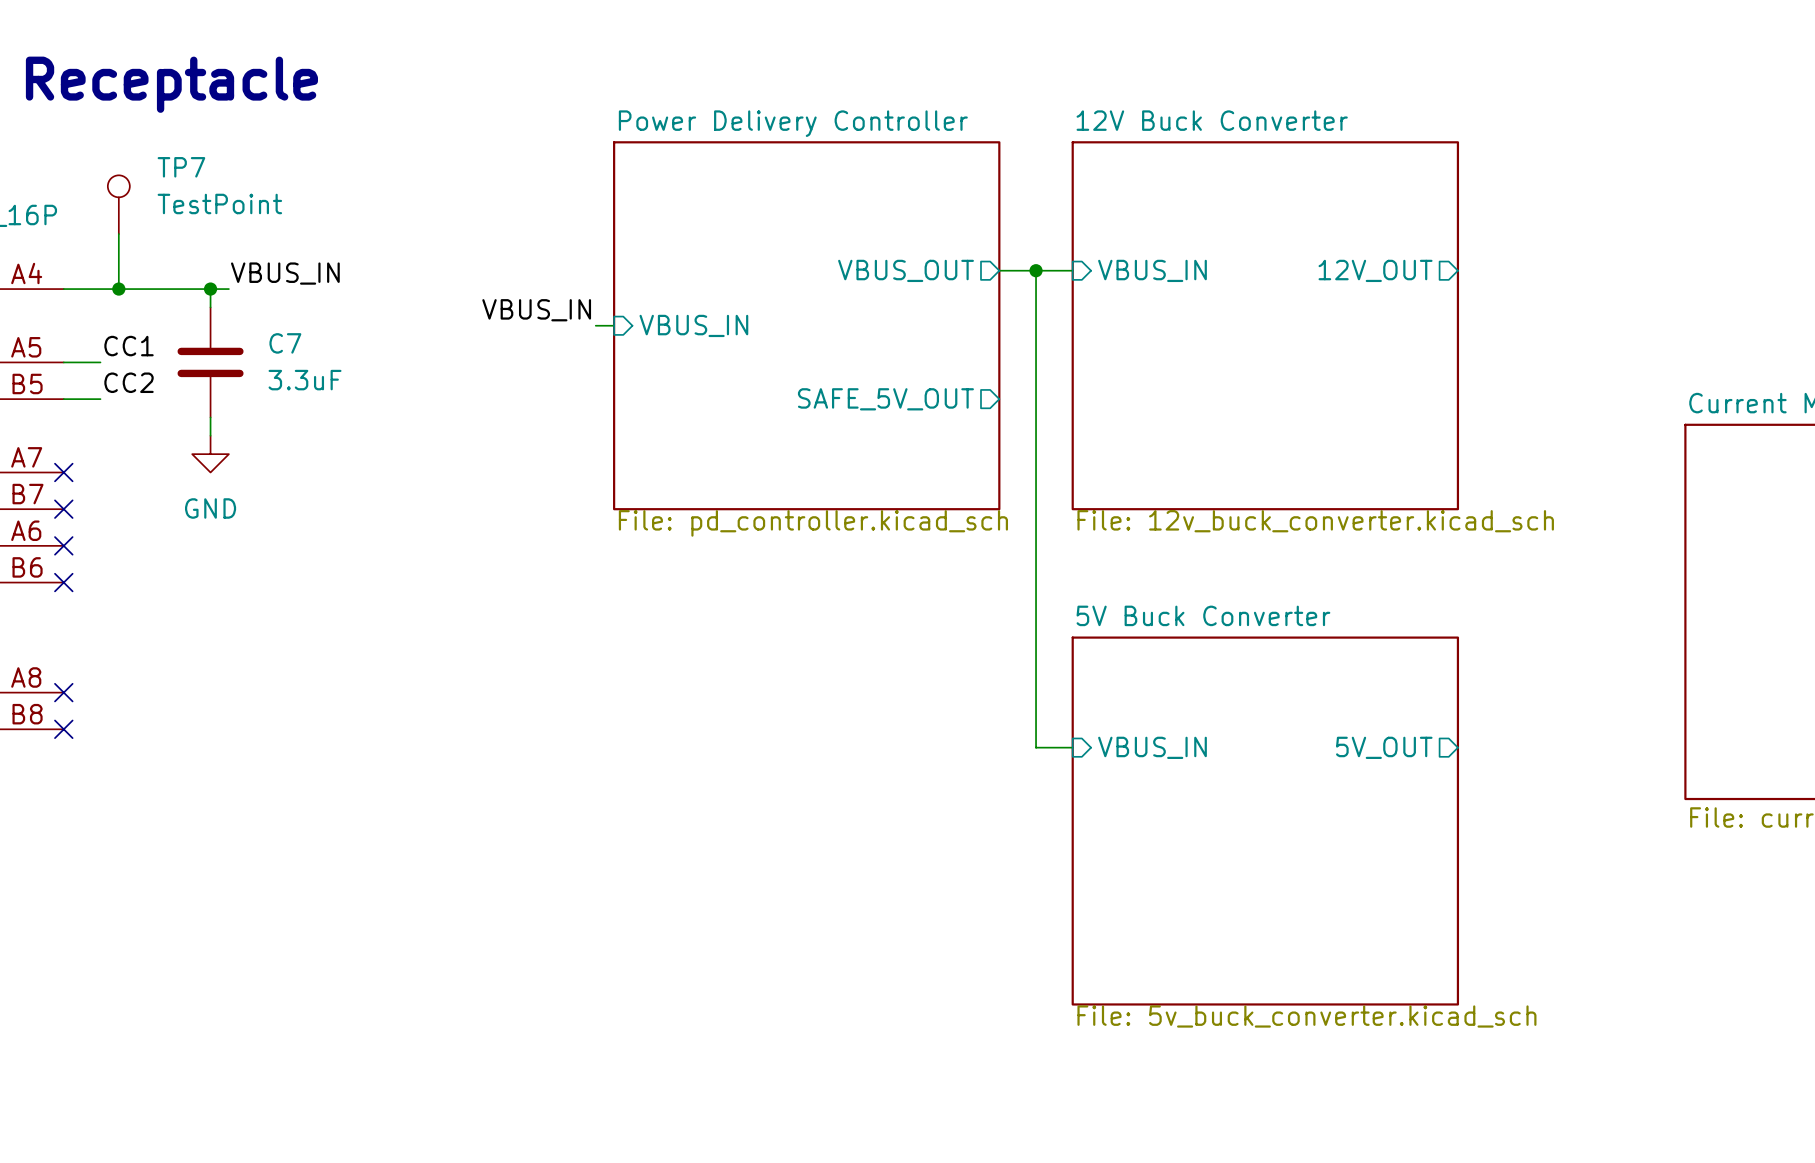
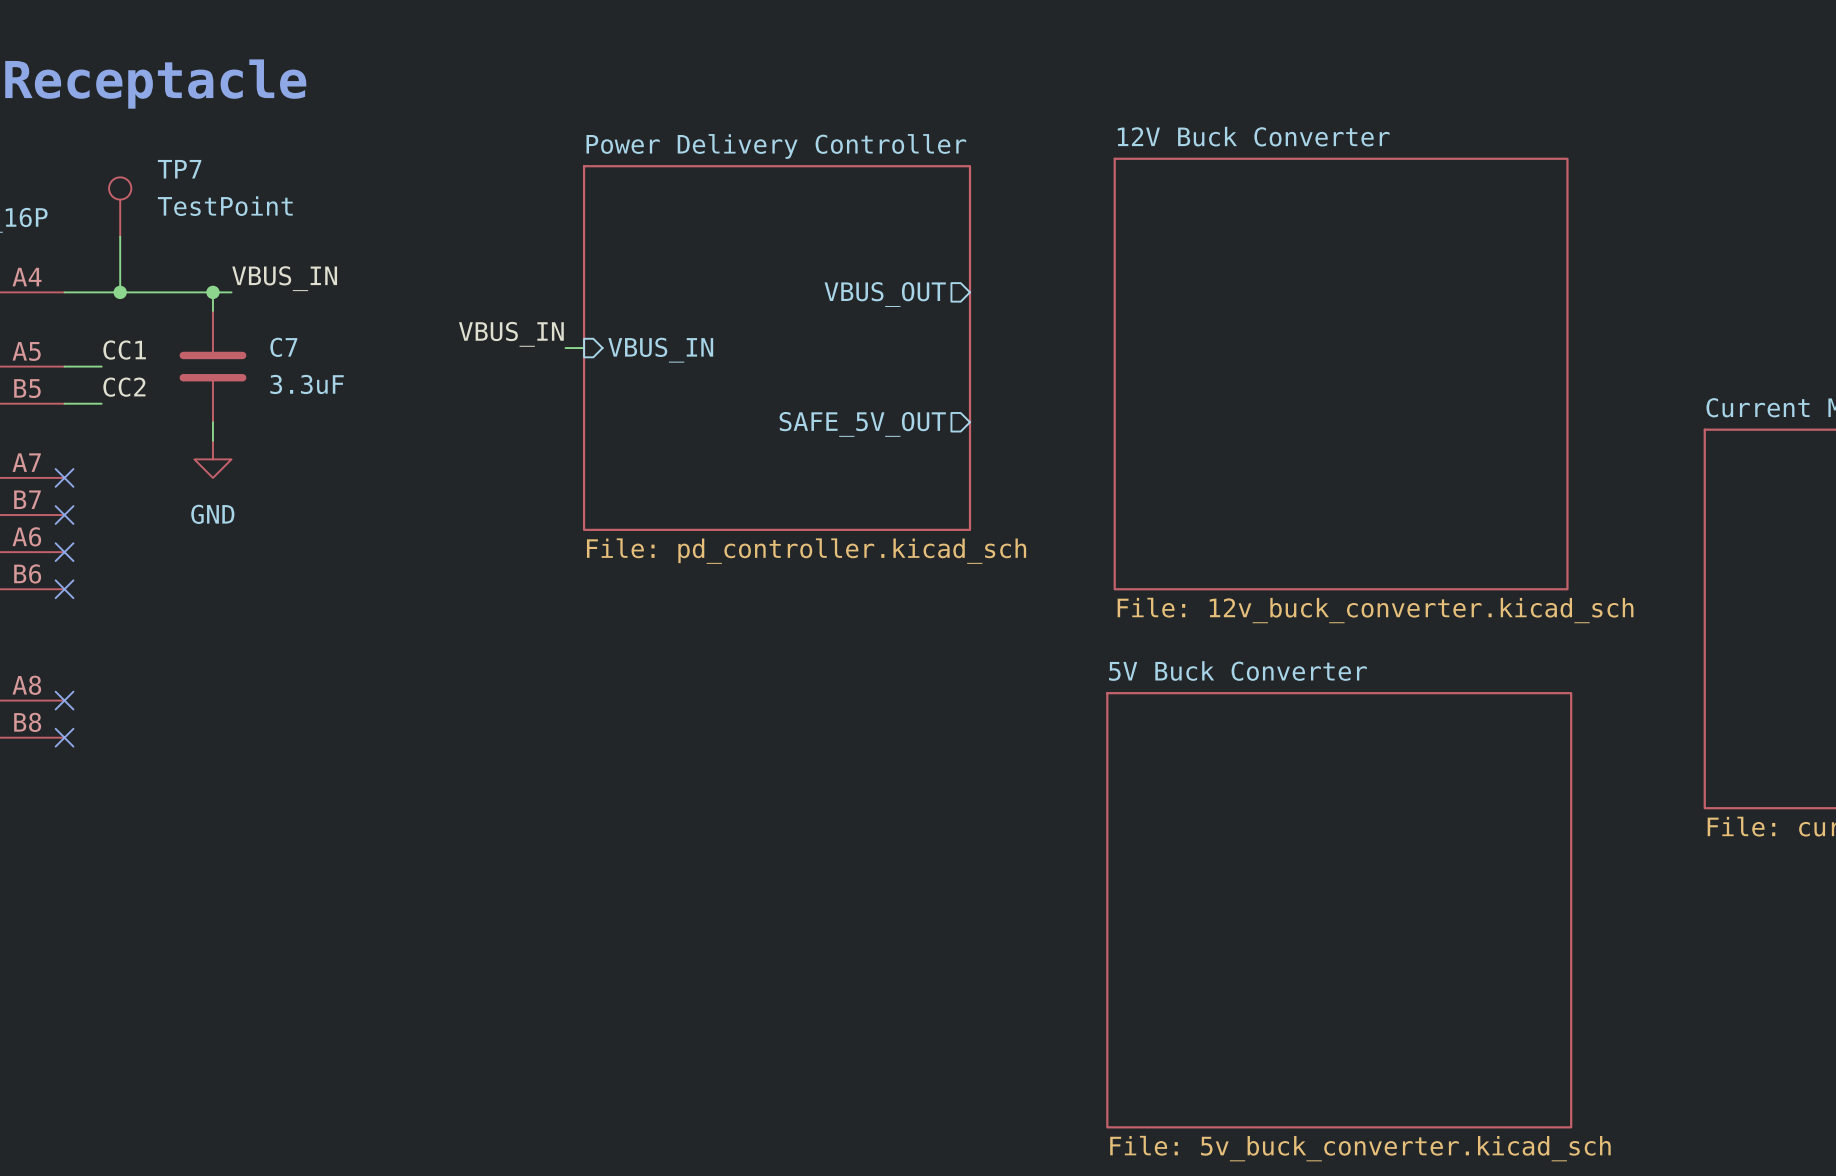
sheet 12V Buck Converter name position: 12V Buck Converter (1212, 120) -> 12V Buck Converter (1253, 136)
sheet 12V Buck Converter shape: [1071, 141, 1460, 511] -> [1113, 157, 1569, 591]
sheet pin position: VBUS_OUT (906, 270) -> VBUS_OUT (885, 294)
wire: (999, 270) (1072, 270) -> none
wire: (1036, 270) (1036, 747) (1072, 747) -> none
junction: (1036, 270) -> none
sheet pin: VBUS_IN (1152, 270) -> none
sheet pin: 12V_OUT (1375, 270) -> none
label position: VBUS_IN (536, 310) -> VBUS_IN (511, 334)
wire: (595, 325) (614, 325) -> (565, 348) (584, 348)
sheet pin position: VBUS_IN (693, 325) -> VBUS_IN (660, 350)
sheet Power Delivery Controller: File: pd_controller.kicad_sch (806, 325) -> none
sheet Power Delivery Controller: none -> File: pd_controller.kicad_sch (777, 348)
sheet pin position: SAFE_5V_OUT (885, 399) -> SAFE_5V_OUT (862, 424)
sheet 12V Buck Converter value position: File: 12v_buck_converter.kicad_sch (1315, 521) -> File: 12v_buck_converter.kicad_sch (1375, 610)
sheet 5V Buck Converter name position: 5V Buck Converter (1203, 615) -> 5V Buck Converter (1237, 671)
sheet 5V Buck Converter shape: [1071, 636, 1460, 1006] -> [1106, 692, 1573, 1129]
sheet pin: VBUS_IN (1152, 747) -> none
sheet pin: 5V_OUT (1384, 747) -> none
sheet 5V Buck Converter value position: File: 5v_buck_converter.kicad_sch (1306, 1016) -> File: 5v_buck_converter.kicad_sch (1360, 1148)

